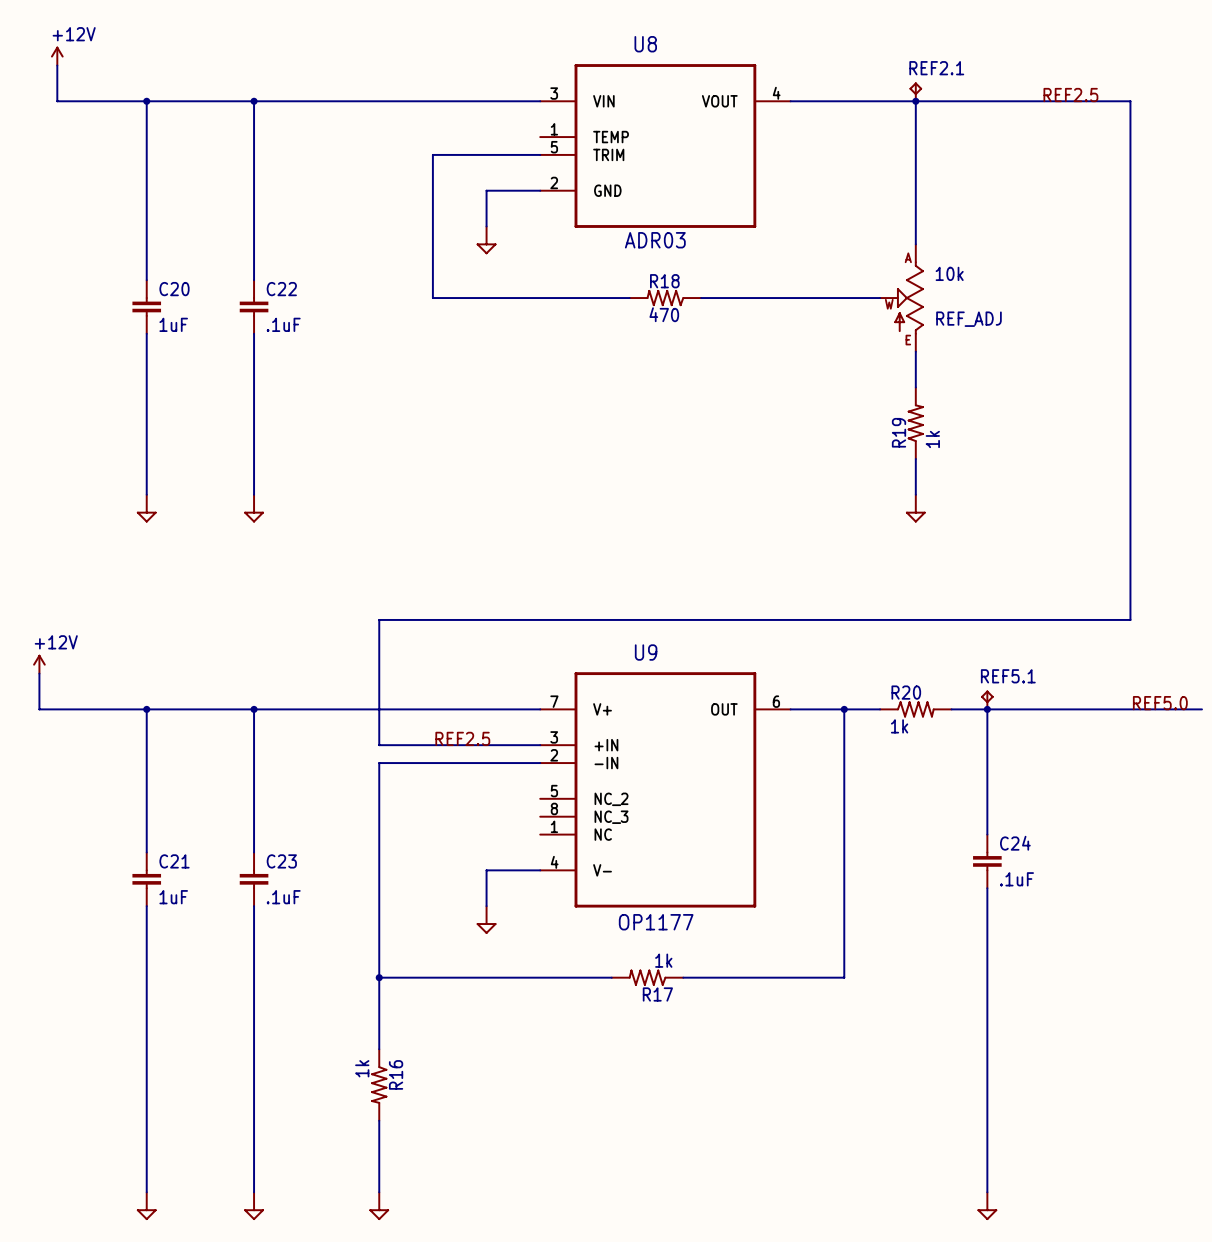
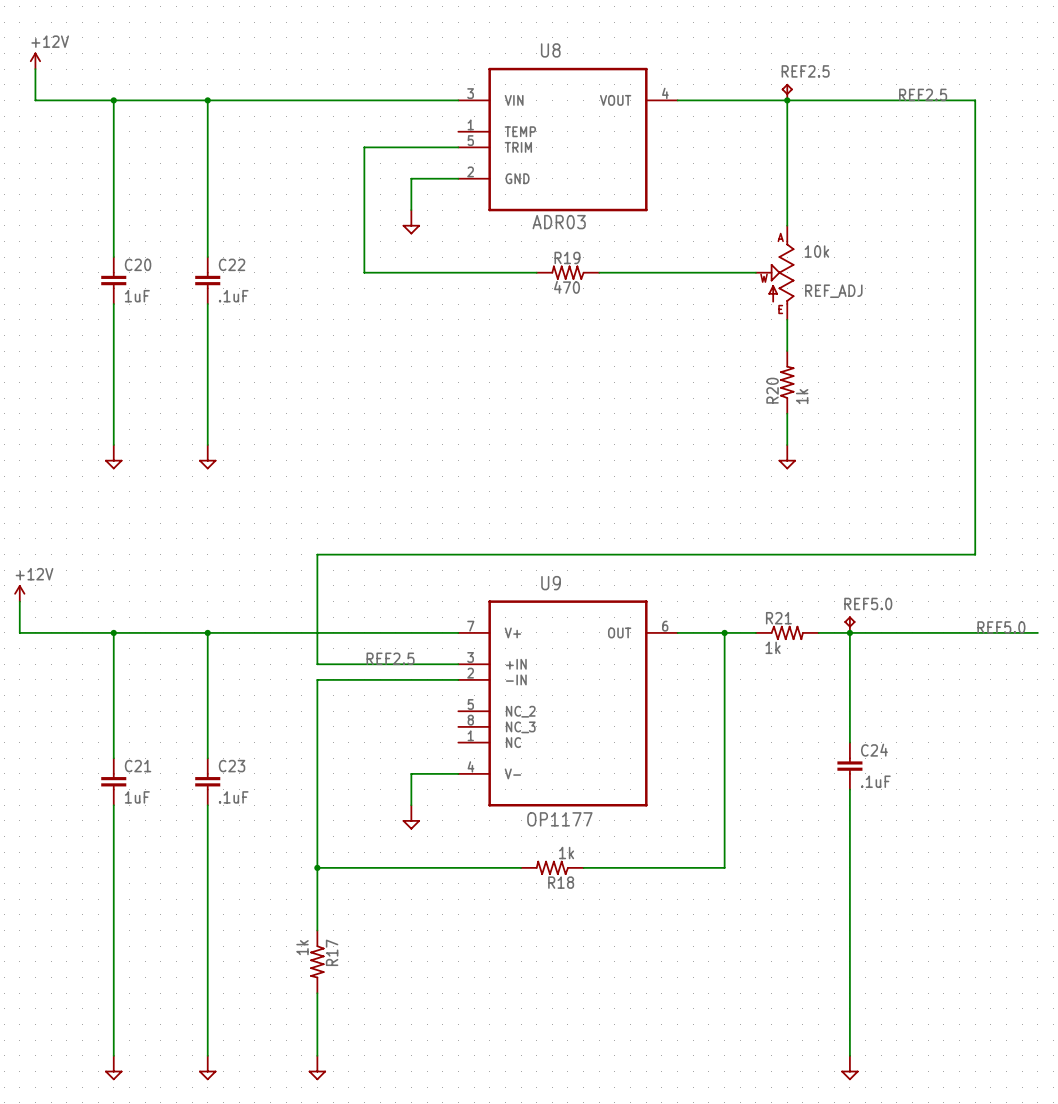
REF2.1 name: REF2.1 (936, 68) -> REF2.5 (805, 71)
R18 name: R18 (664, 281) -> R19 (567, 257)
R19 name: R19 (899, 432) -> R20 (772, 390)
REF5.1 name: REF5.1 (1008, 676) -> REF5.0 (868, 603)
R20 name: R20 (906, 692) -> R21 (778, 618)
R17 name: R17 (657, 994) -> R18 (561, 882)
R16 name: R16 (396, 1074) -> R17 (332, 952)

